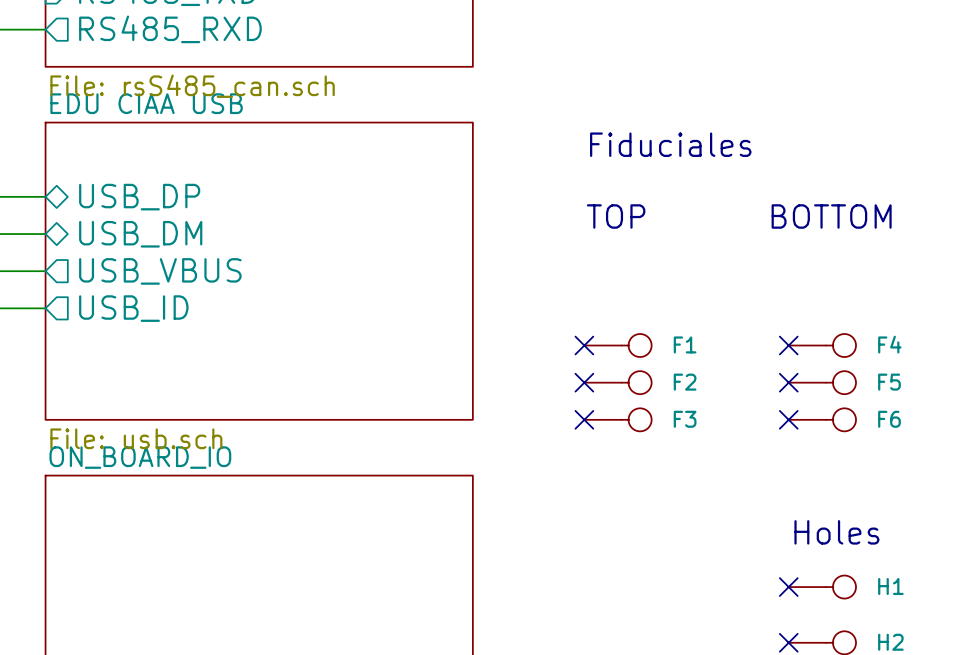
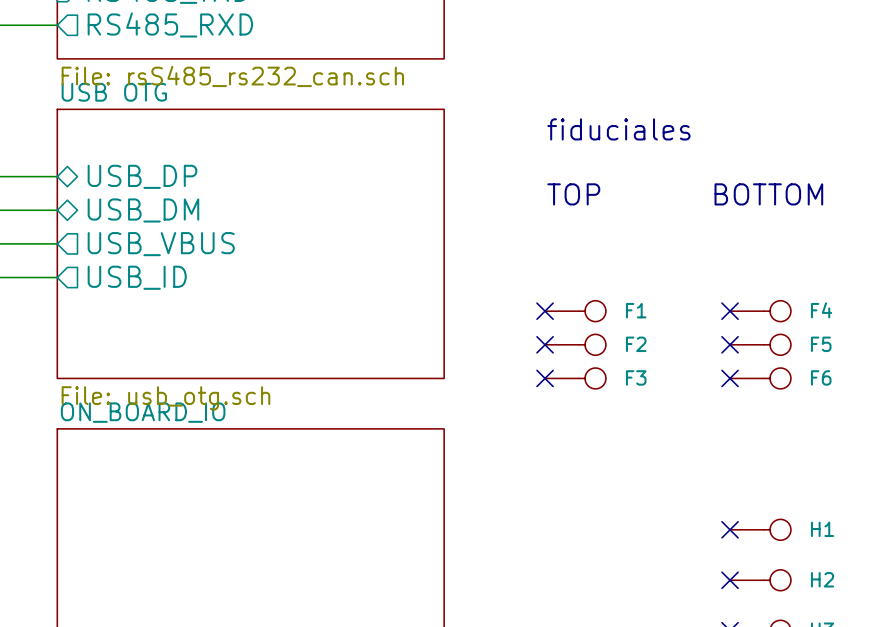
sheet value: File: rsS485_can.sch (192, 86) -> File: rsS485_rs232_can.sch (232, 76)
sheet EDU CIAA USB name: EDU CIAA USB (146, 103) -> USB OTG (114, 92)
text: Fiduciales (670, 144) -> fiduciales (618, 129)
sheet EDU CIAA USB value: File: usb.sch (136, 438) -> File: usb_otg.sch (165, 398)
text: Holes (836, 532) -> none

